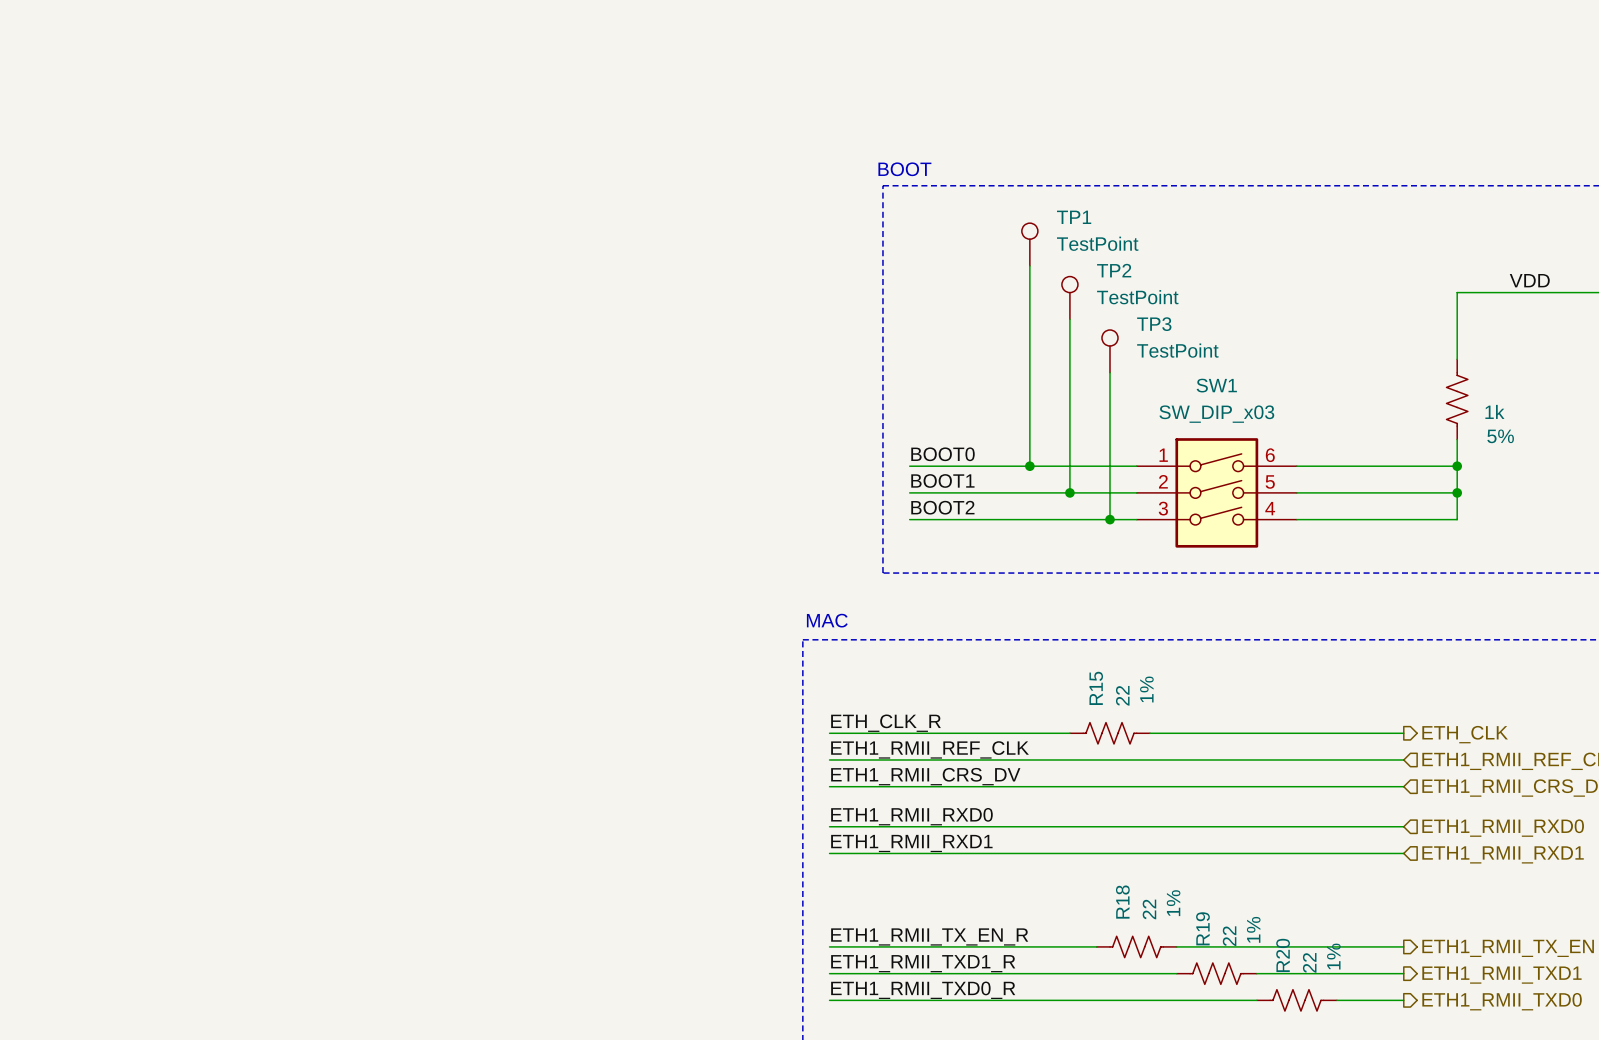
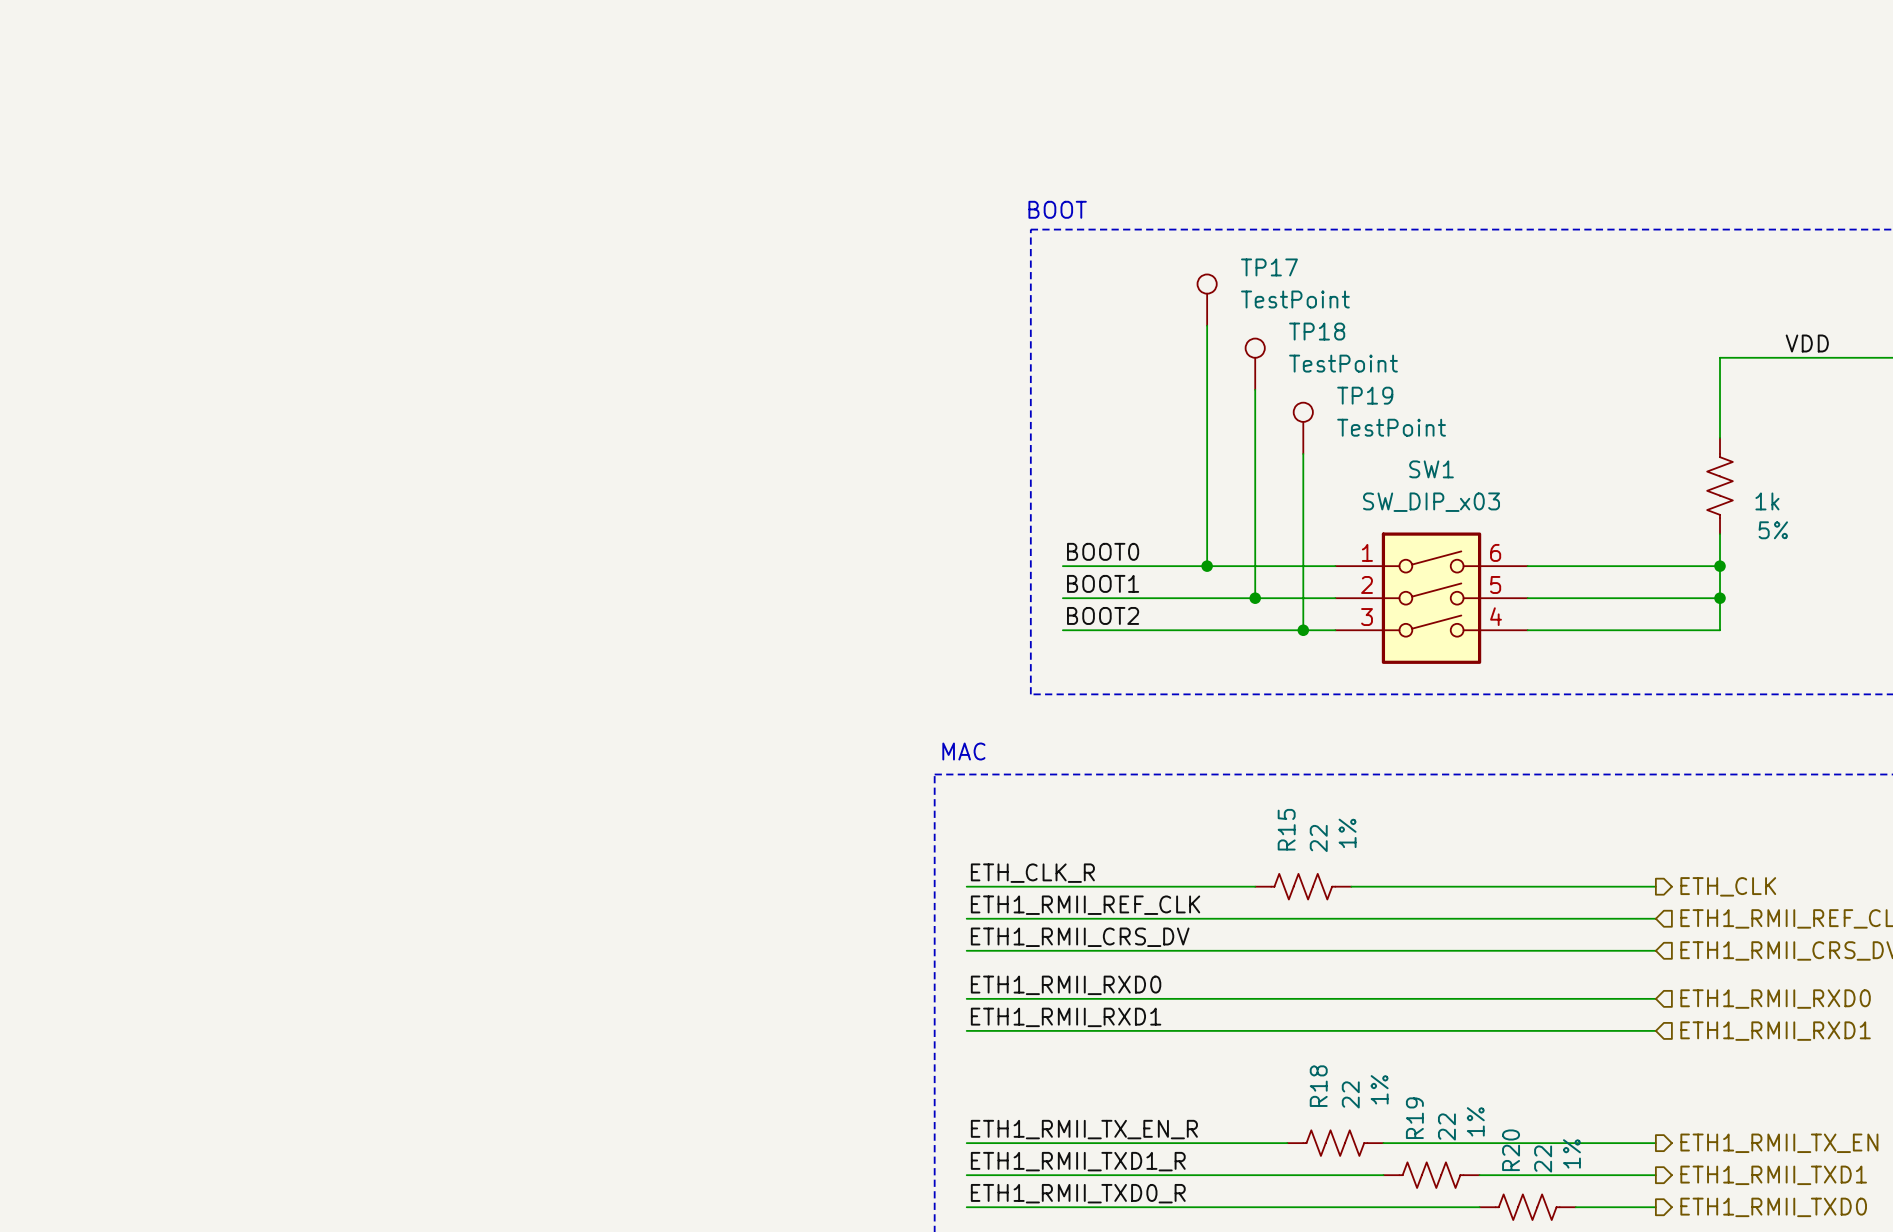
TP1 name: TP1 (1074, 217) -> TP17 (1269, 267)
TP2 name: TP2 (1114, 270) -> TP18 (1317, 331)
TP3 name: TP3 (1154, 324) -> TP19 (1365, 395)

